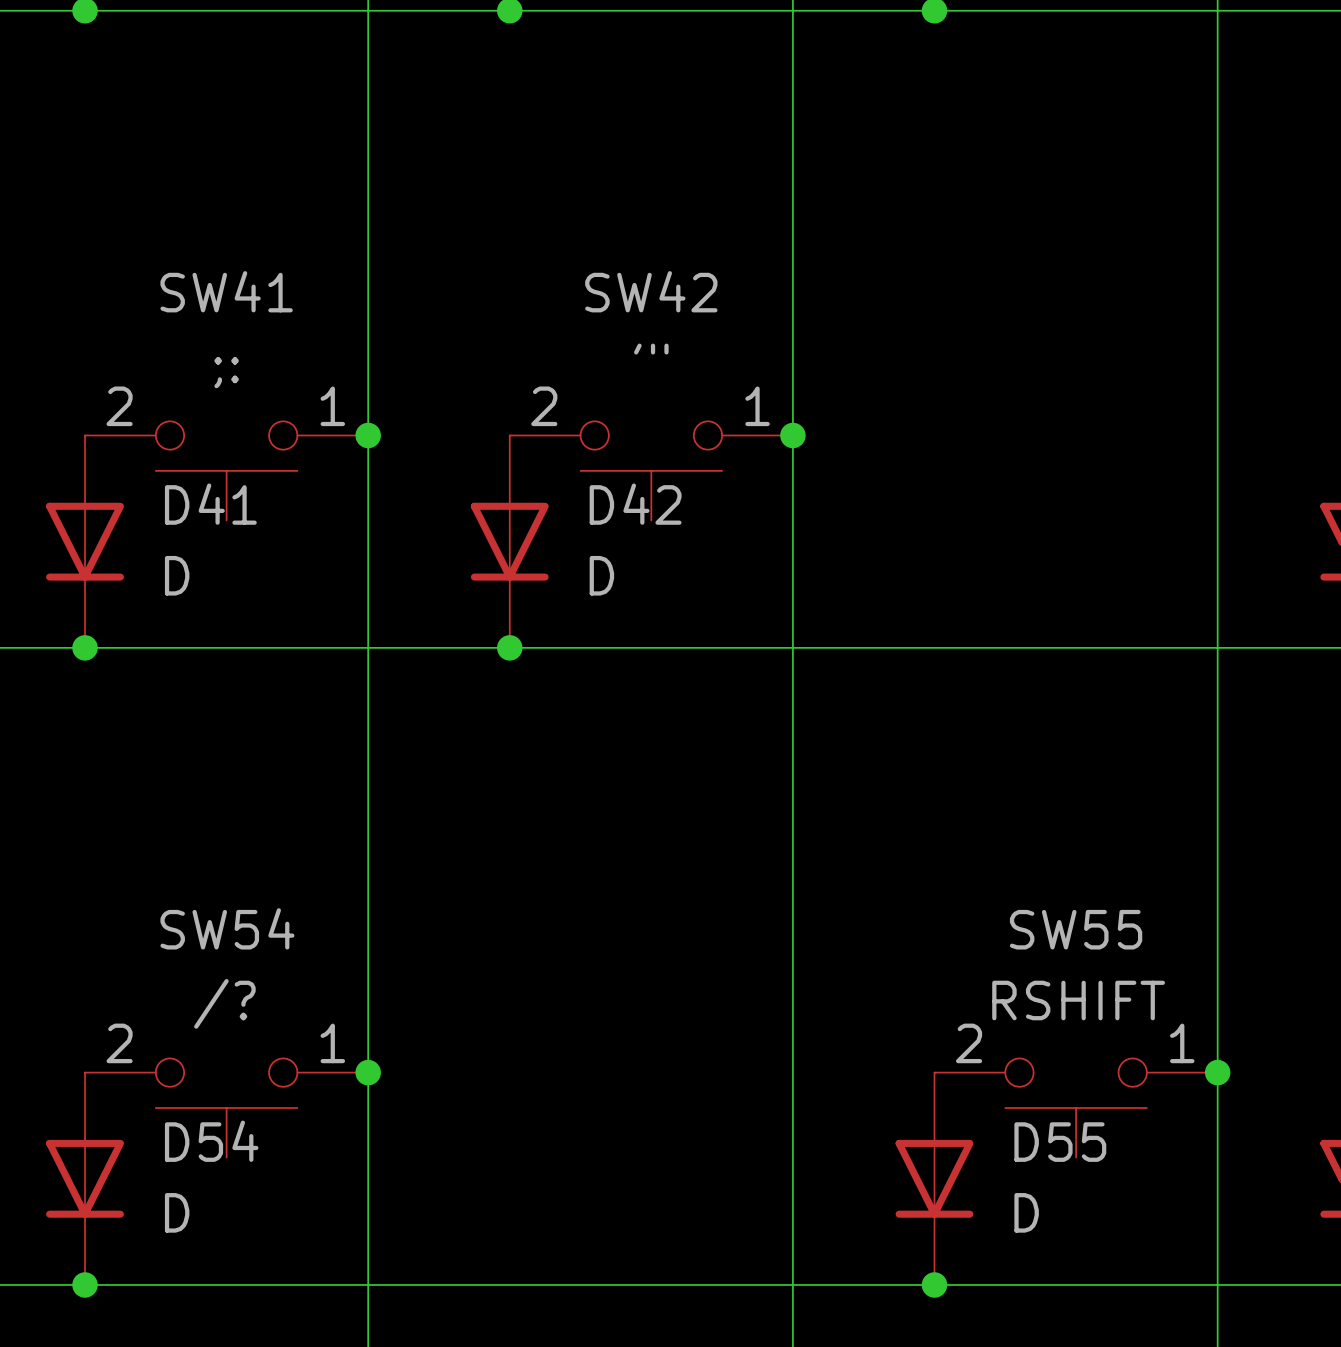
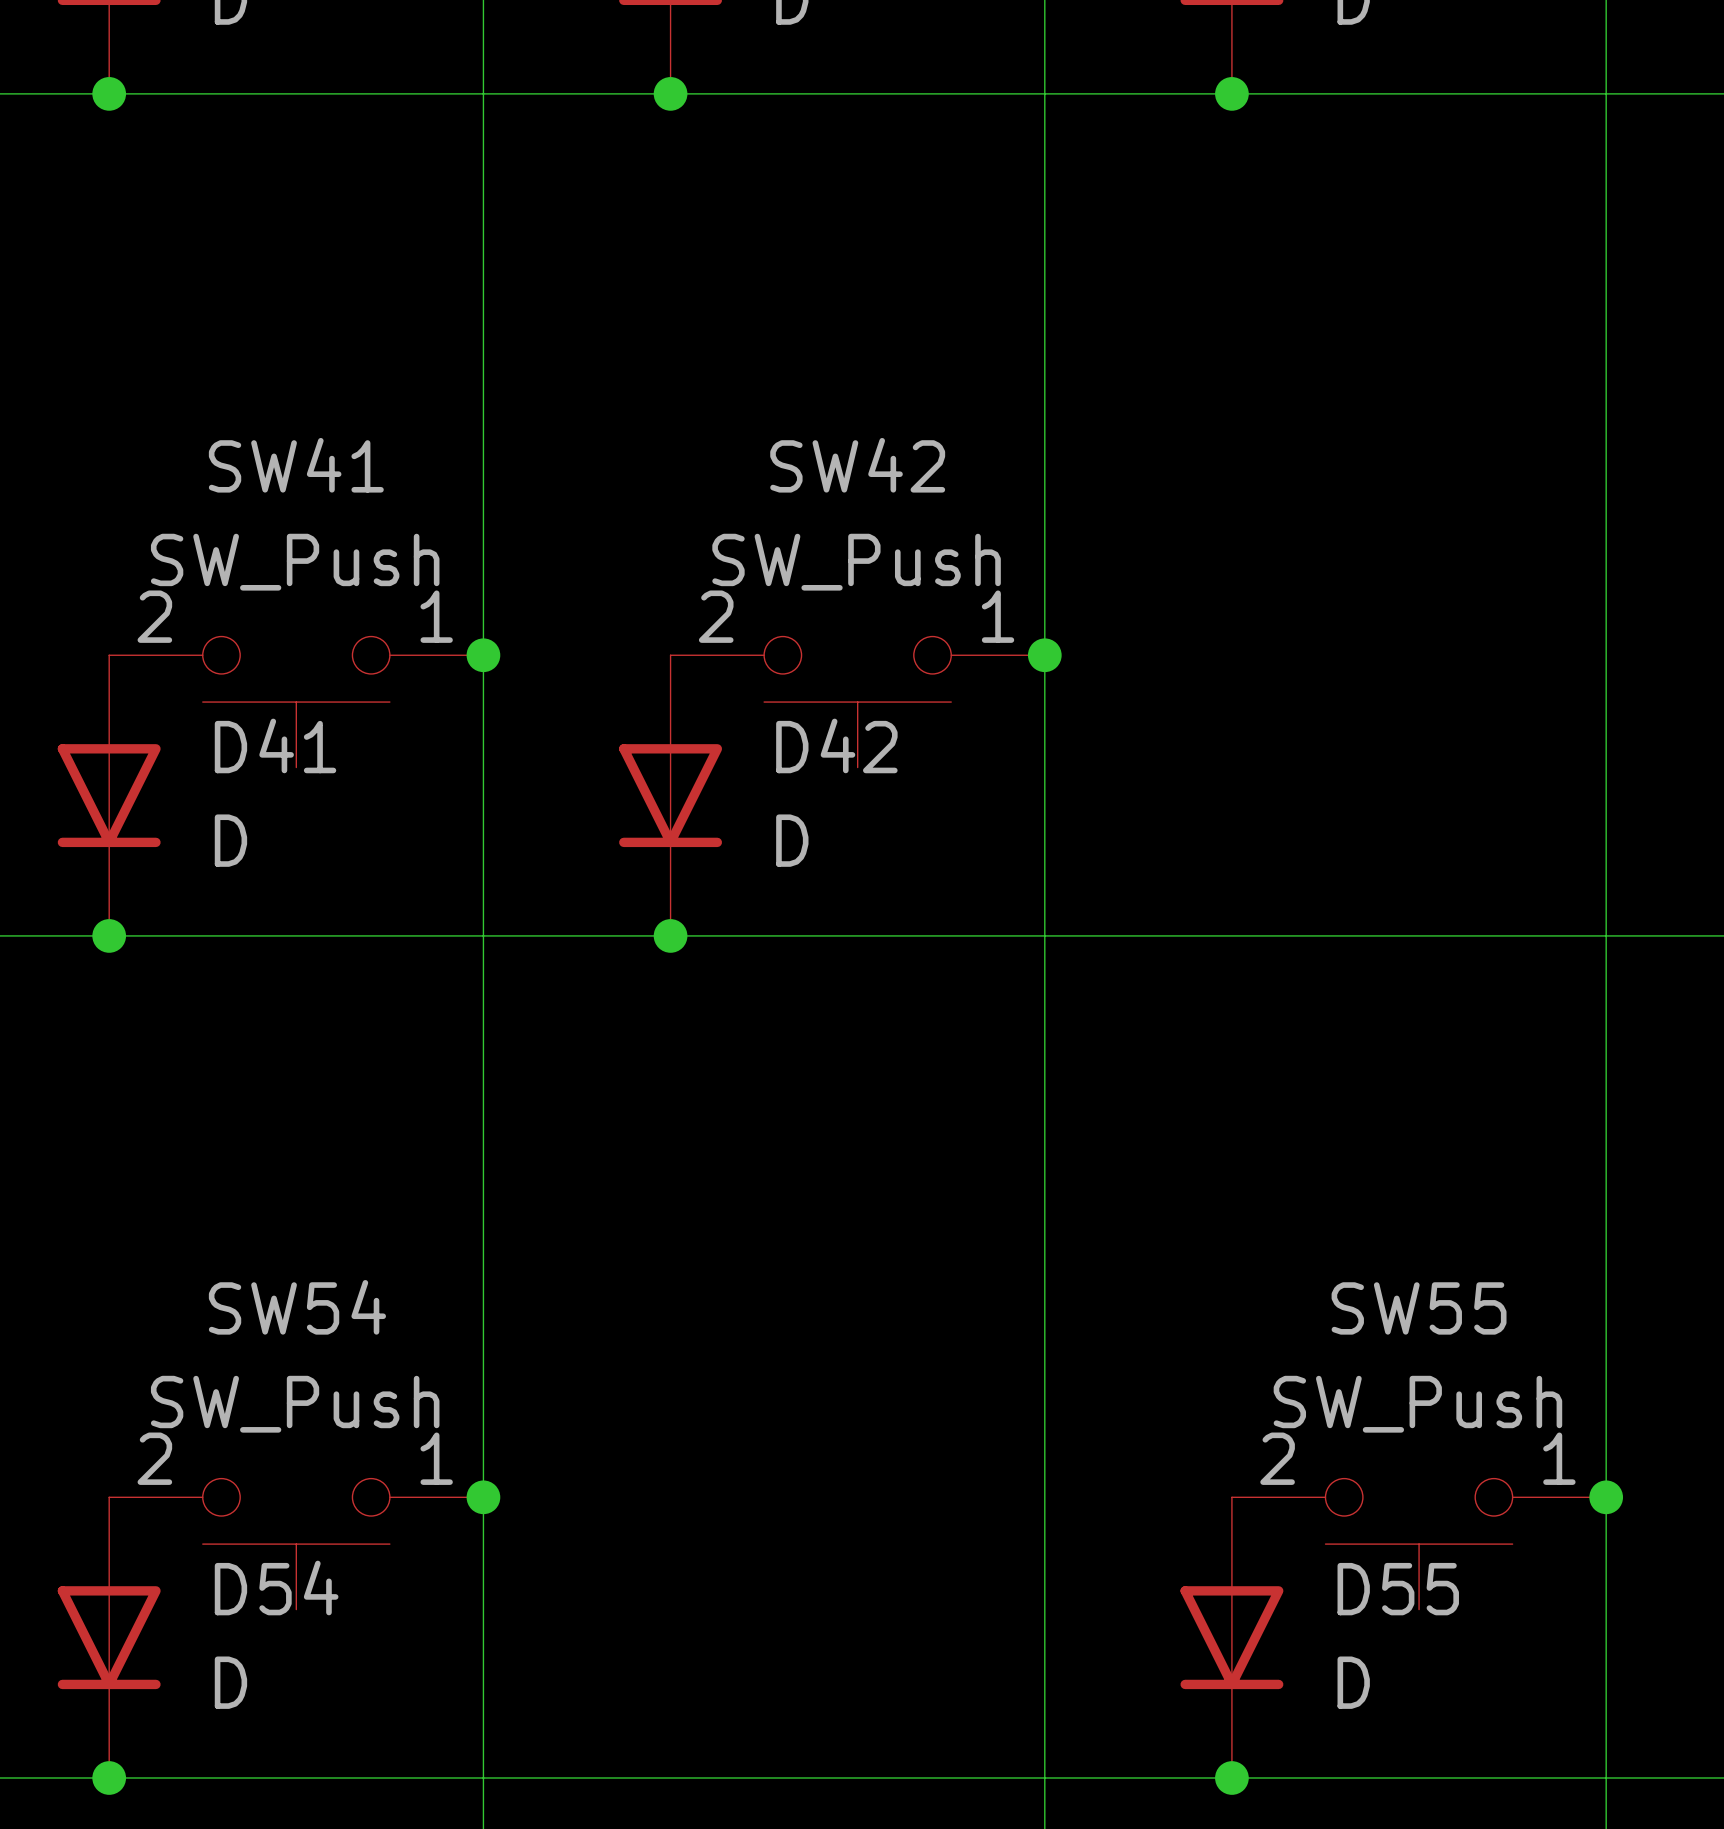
SW42 value: '" (651, 349) -> SW_Push (856, 562)
SW41 value: ;: (226, 372) -> SW_Push (295, 562)
SW55 value: RSHIFT (1078, 1000) -> SW_Push (1417, 1404)
SW54 value: /? (224, 1003) -> SW_Push (295, 1404)

